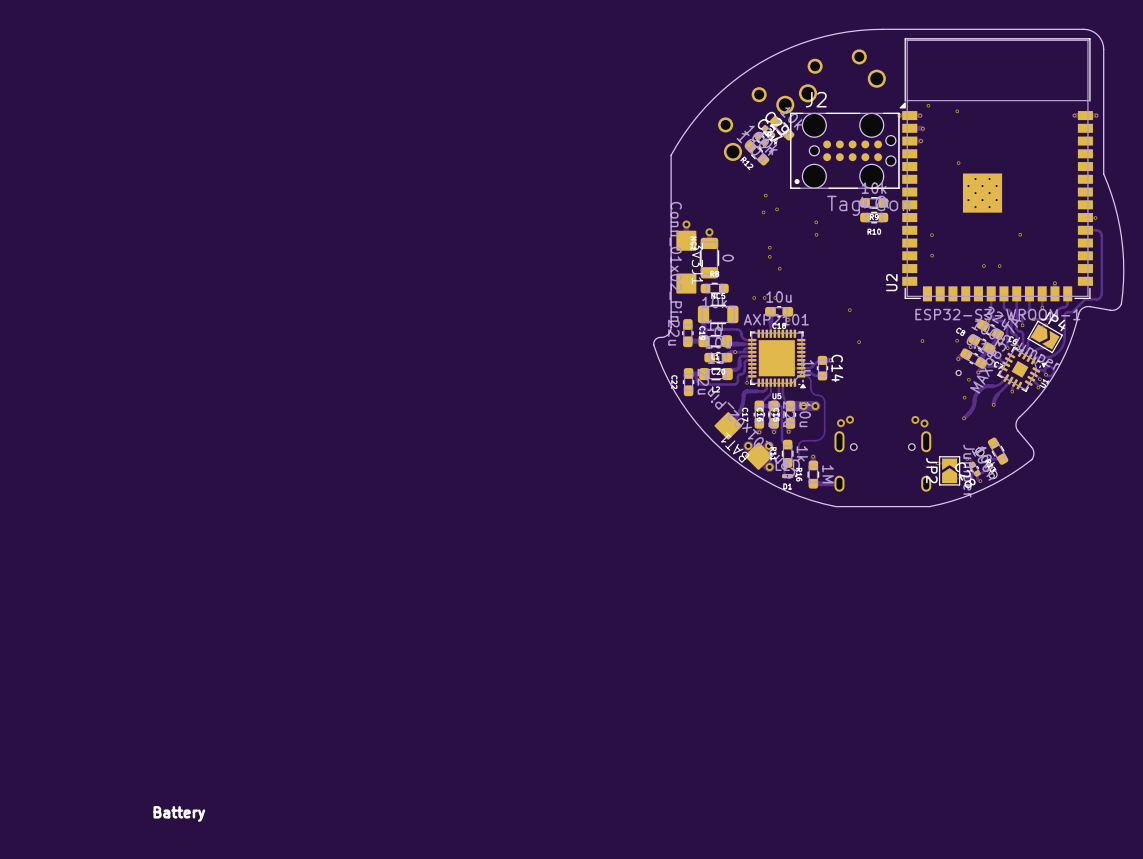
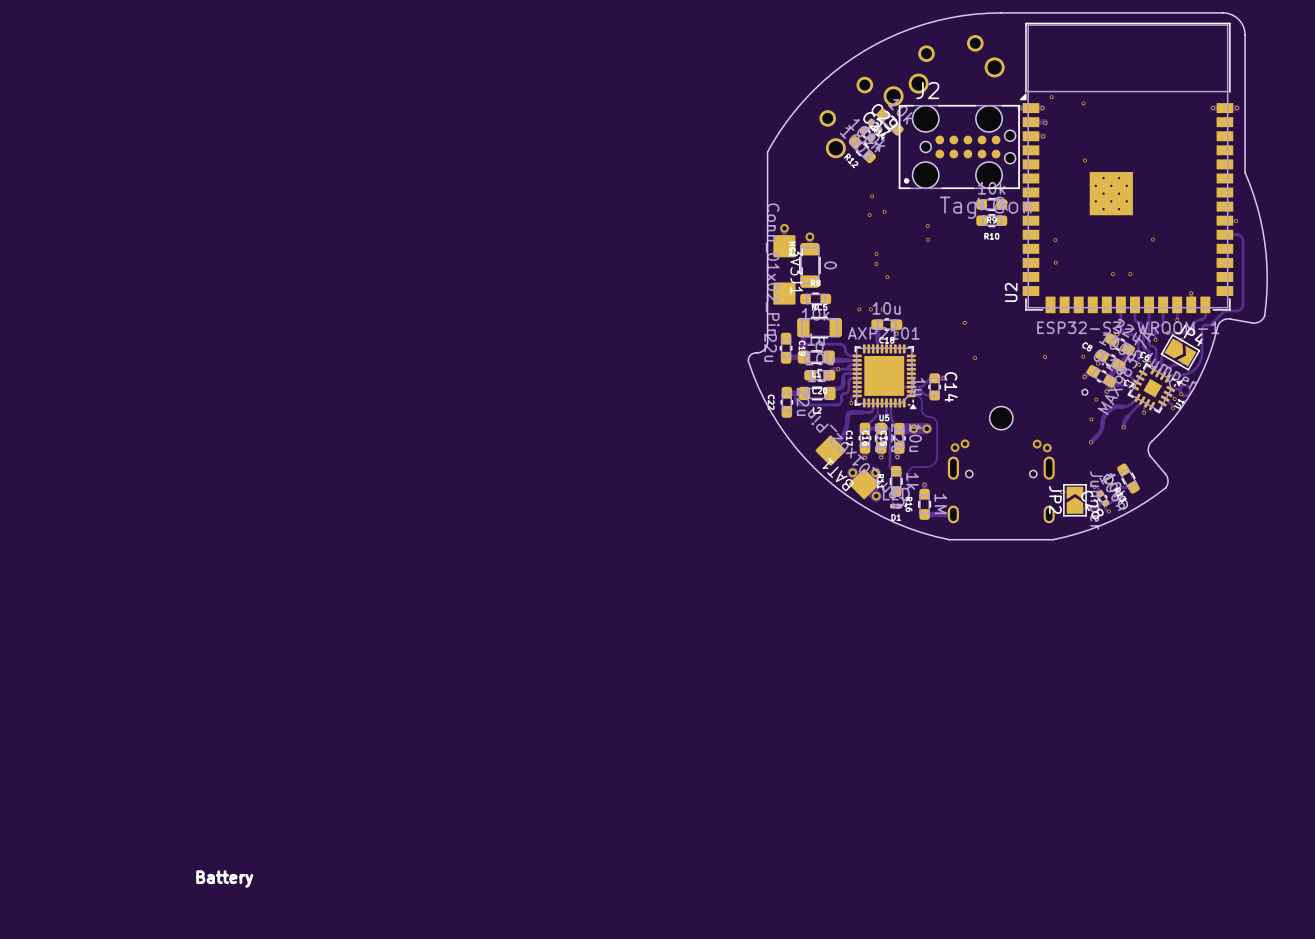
part: none -> (1001, 418)

